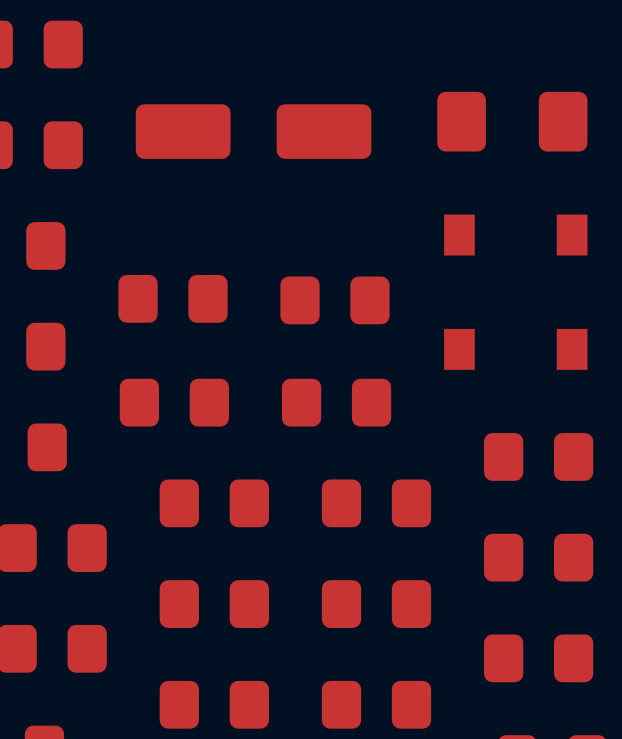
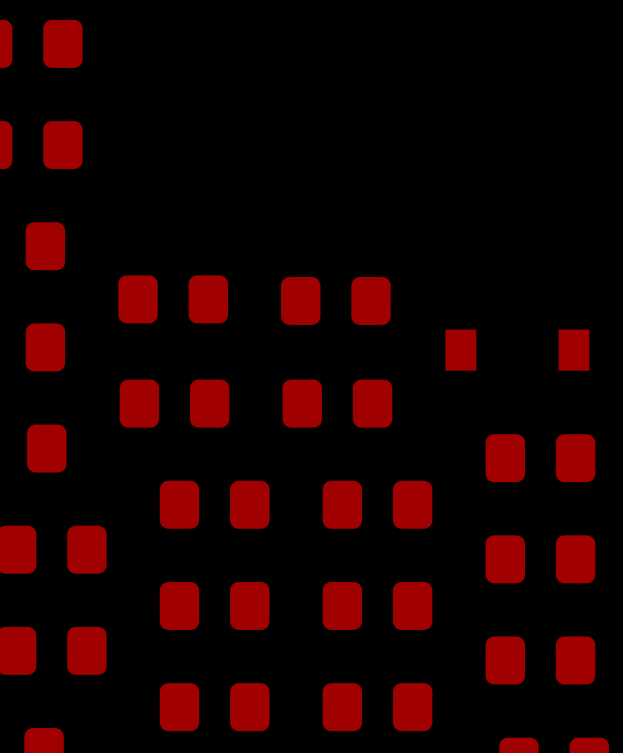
part: (512, 121) -> none
part: (253, 131) -> none
part: (515, 235) -> none

